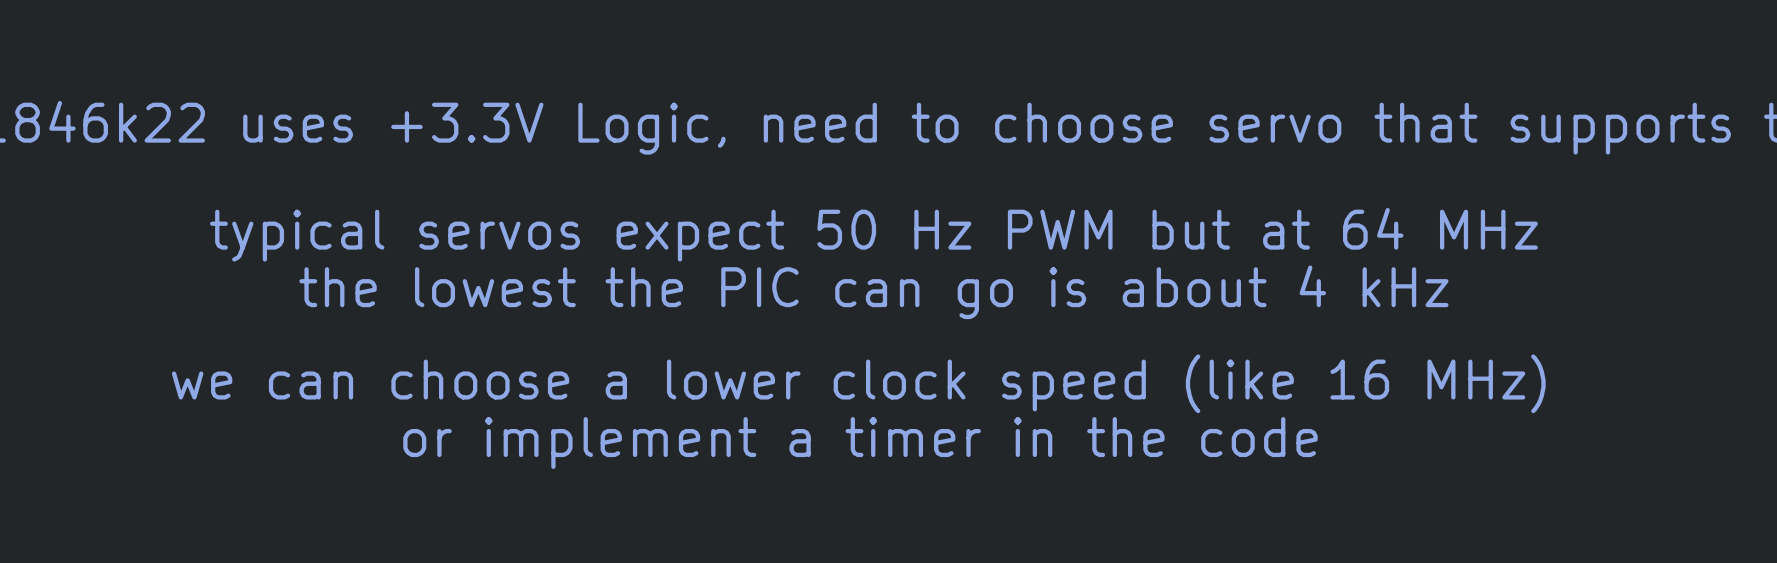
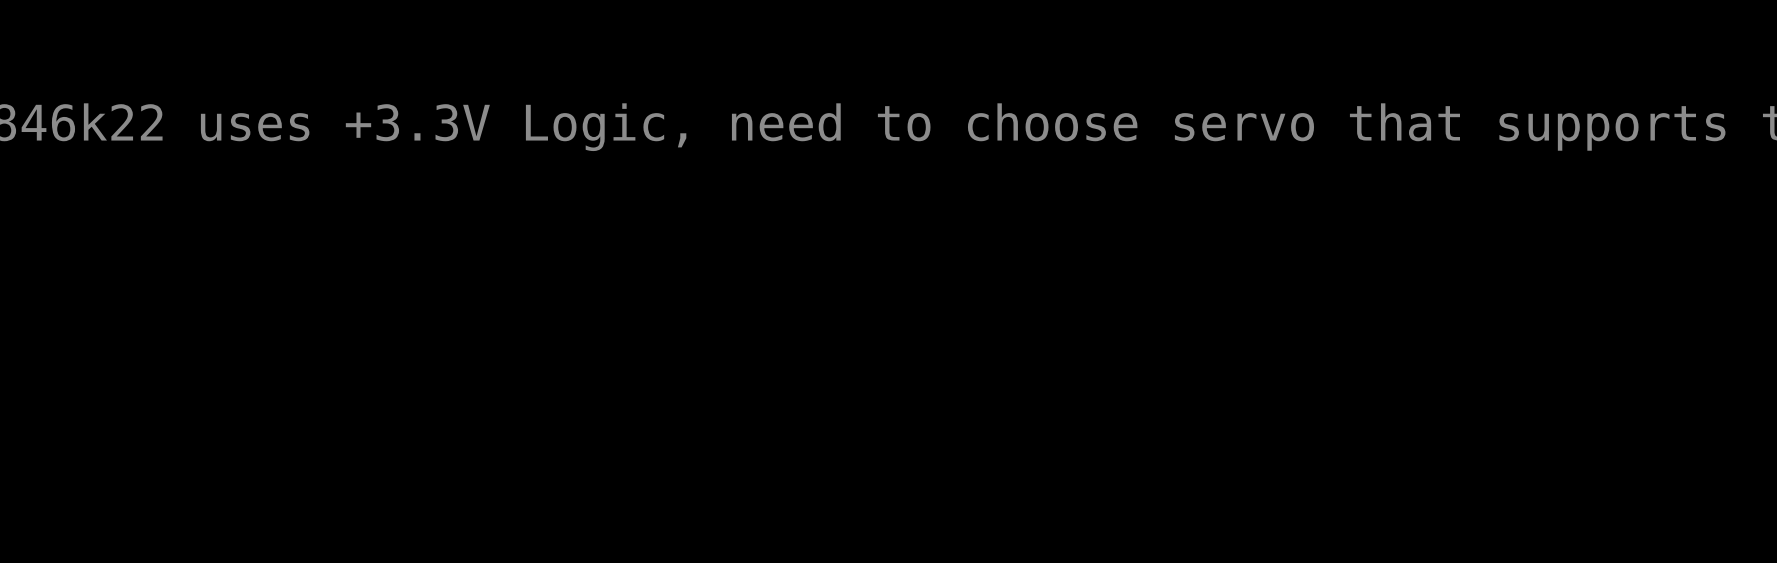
text: typical servos expect 50 Hz PWM but at 64 MHz (873, 234) -> none
text: the lowest the PIC can go is about 4 kHz (873, 292) -> none
text: we can choose a lower clock speed (like 16 MHz) (858, 383) -> none
text: or implement a timer in the code (860, 443) -> none

